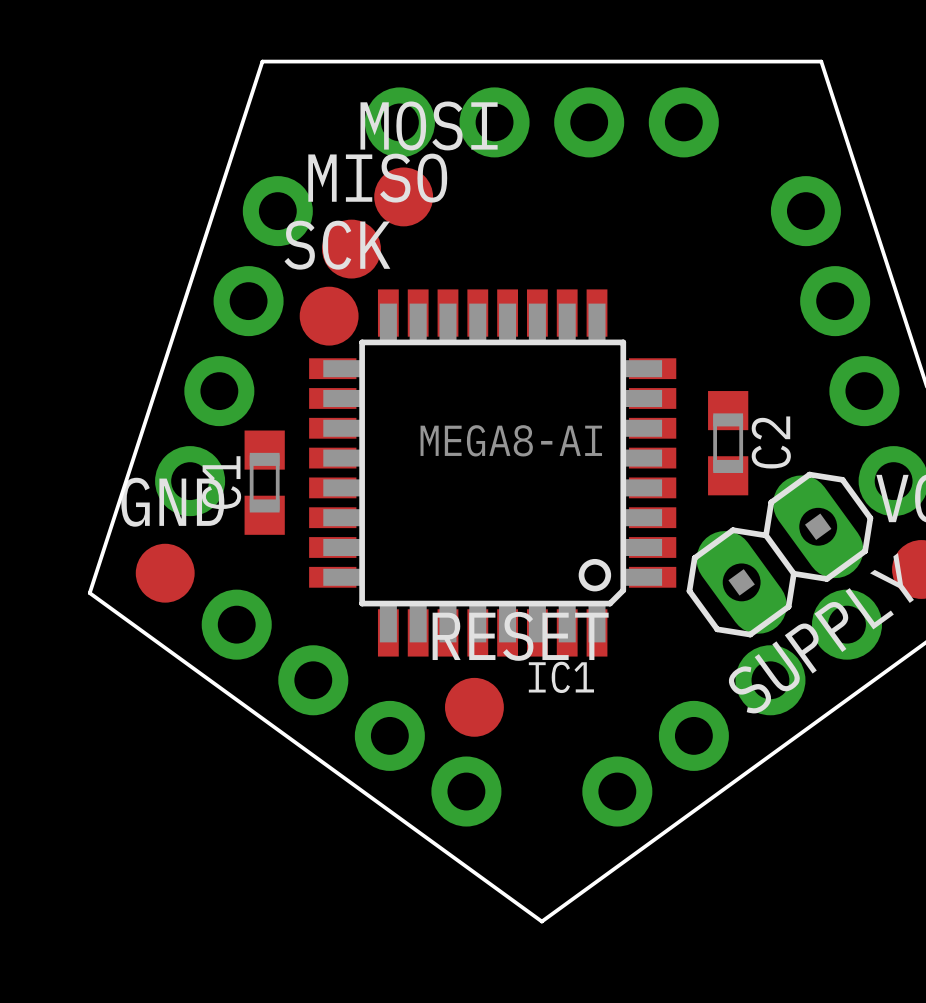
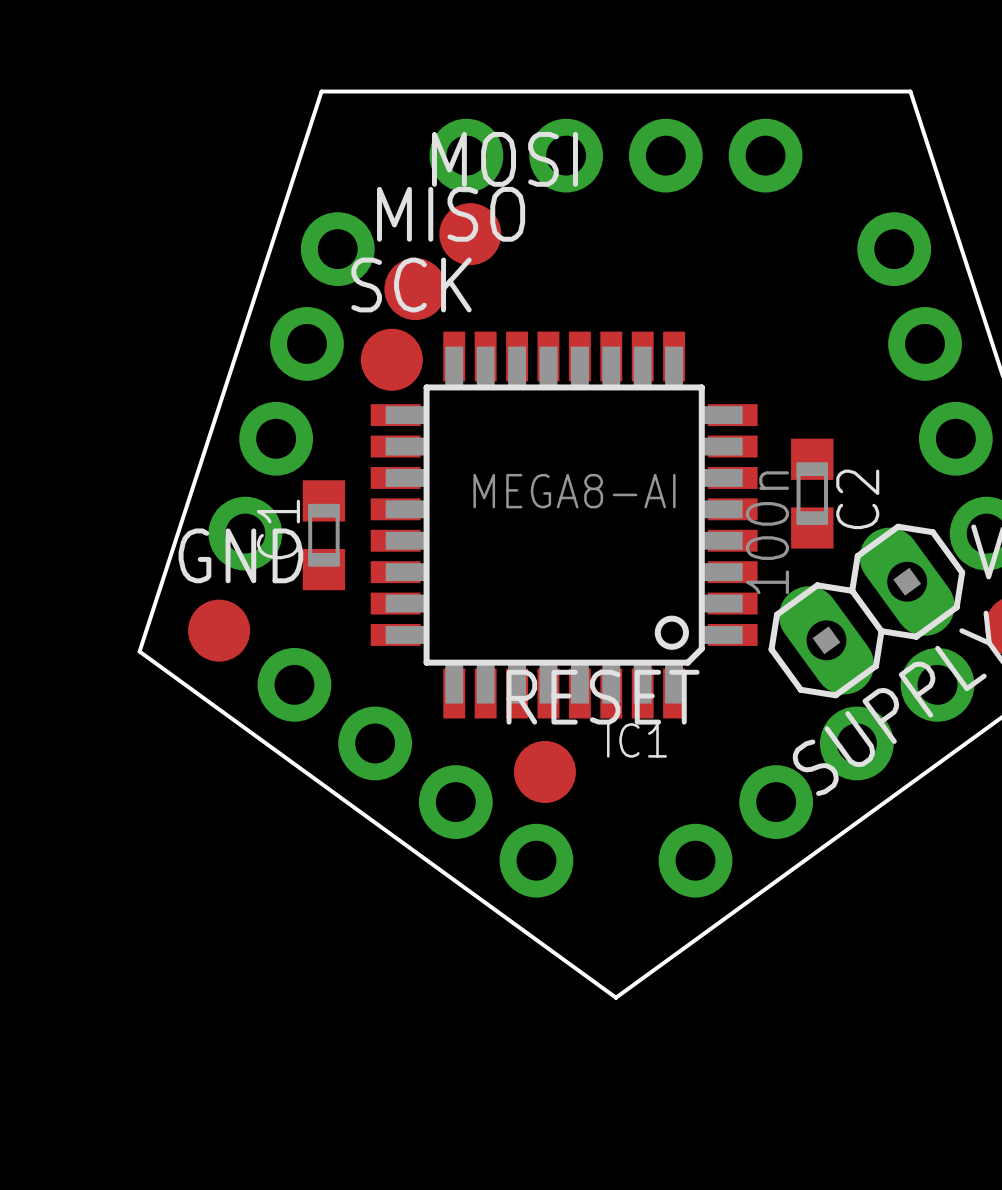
C2 value: none -> 100n (767, 532)

